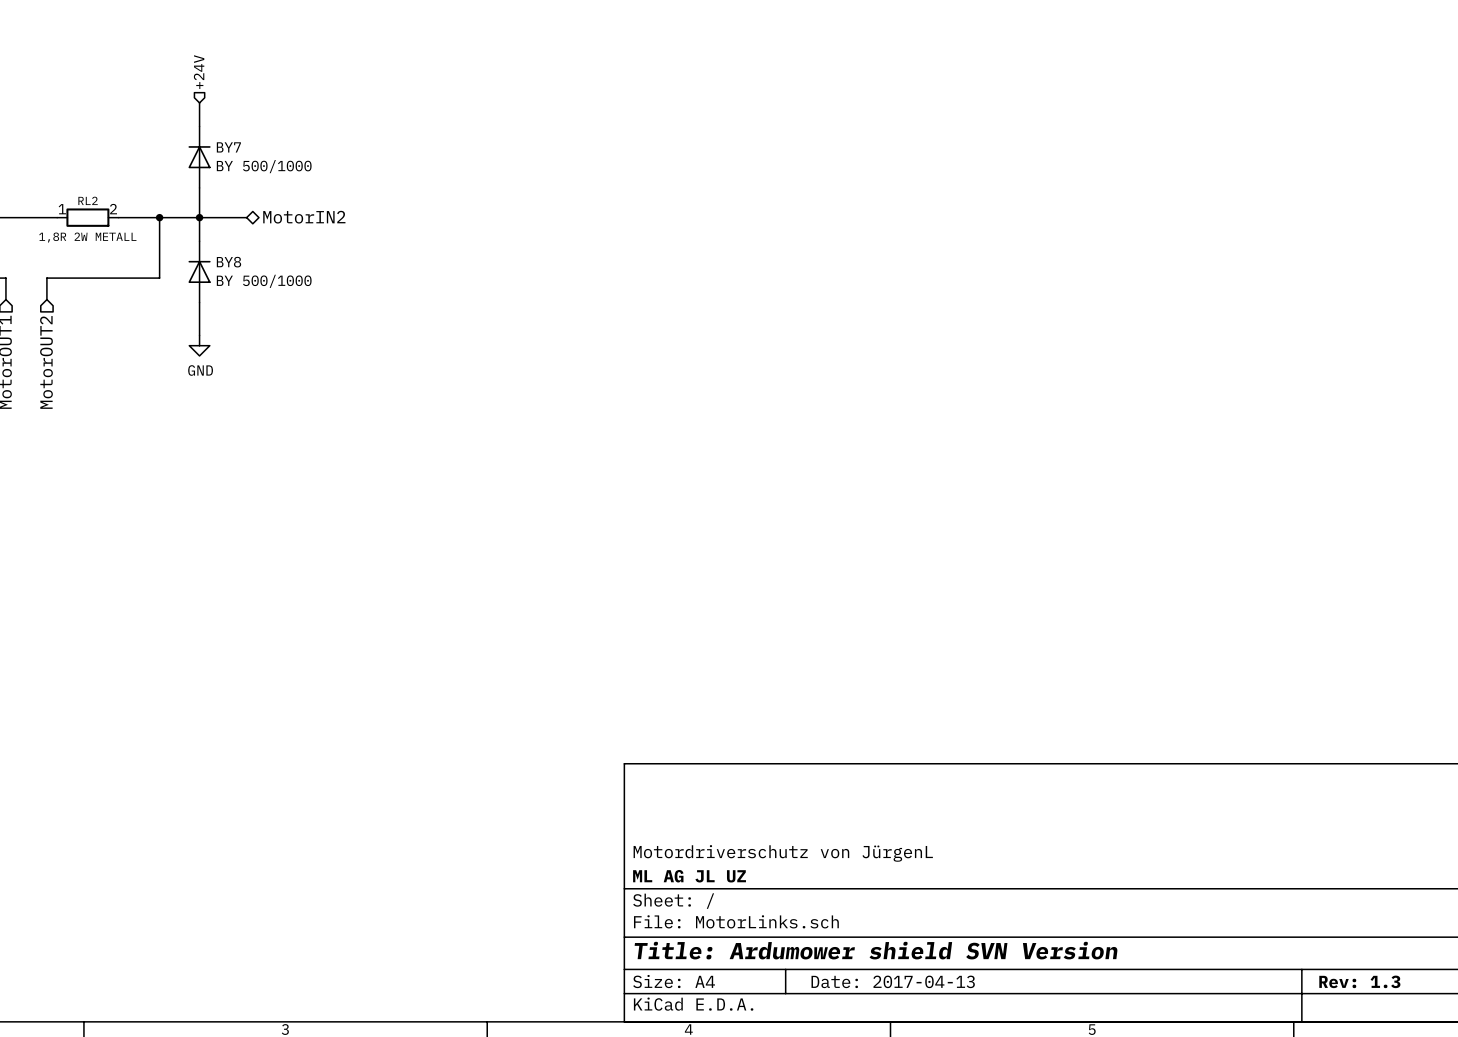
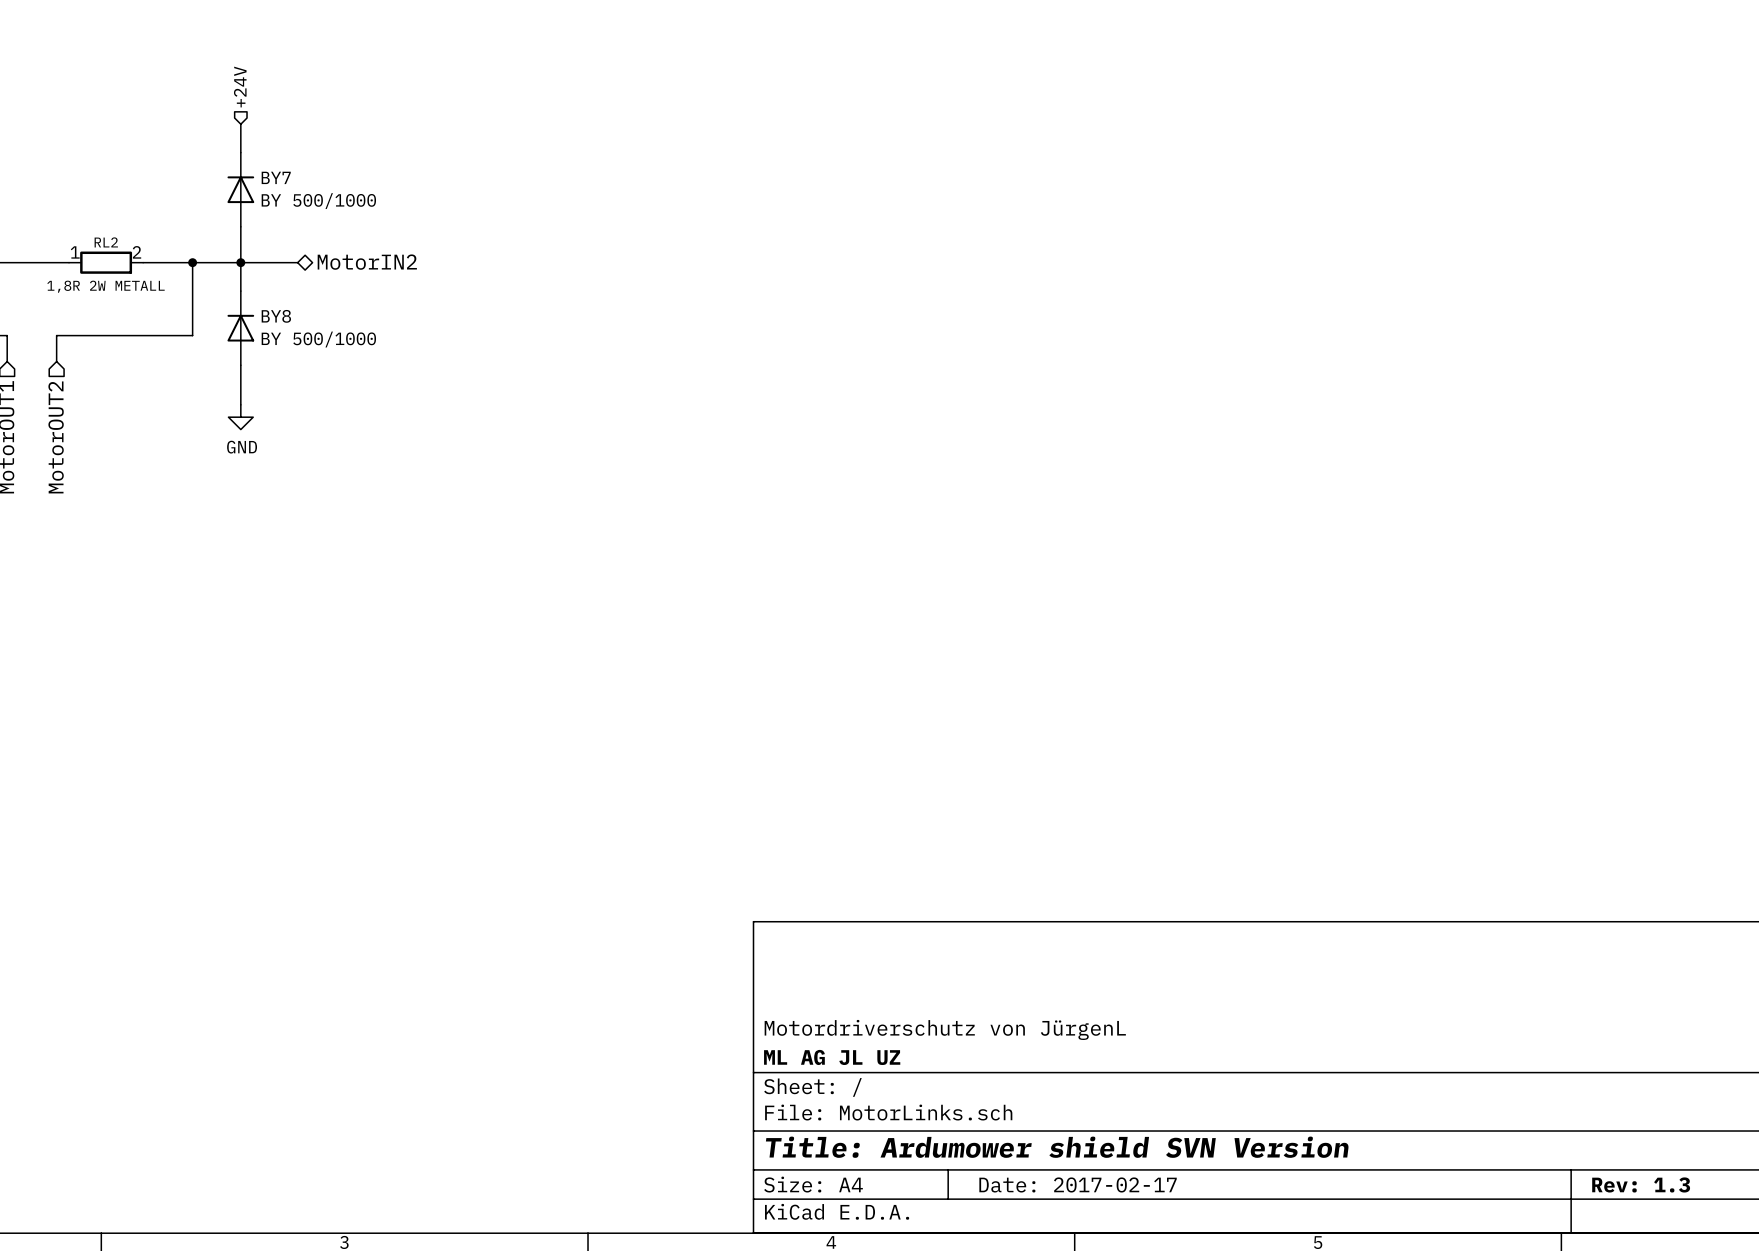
title block: Date: 2017-04-13 (893, 981) -> Date: 2017-02-17 (1078, 1184)

